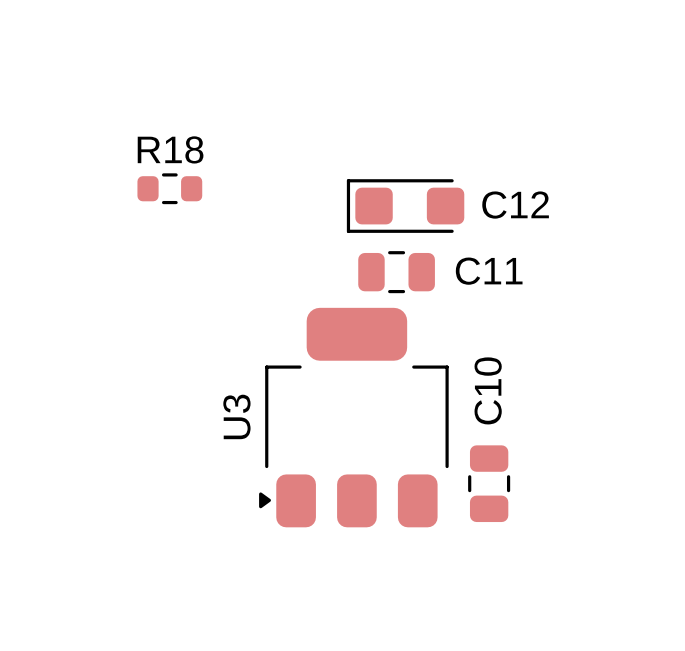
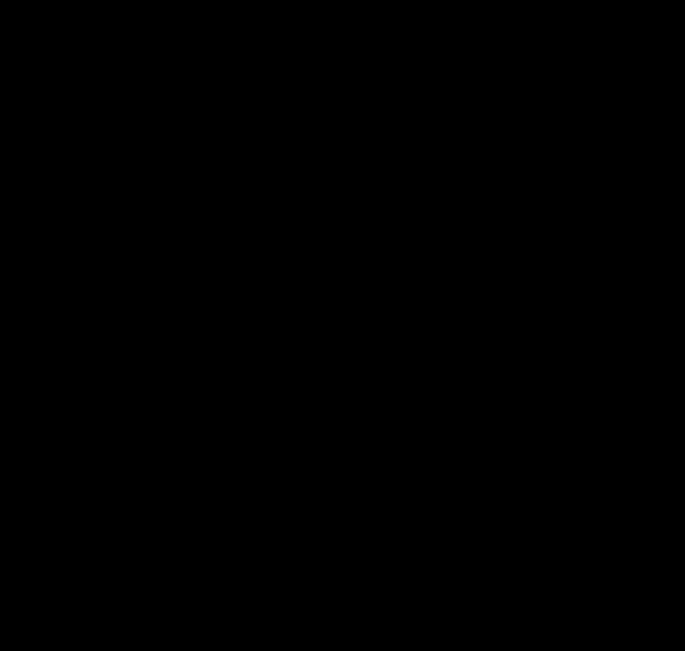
R18: (169, 188) -> none
C12: (405, 206) -> none
C11: (396, 272) -> none
U3: (353, 417) -> none
C10: (489, 483) -> none

